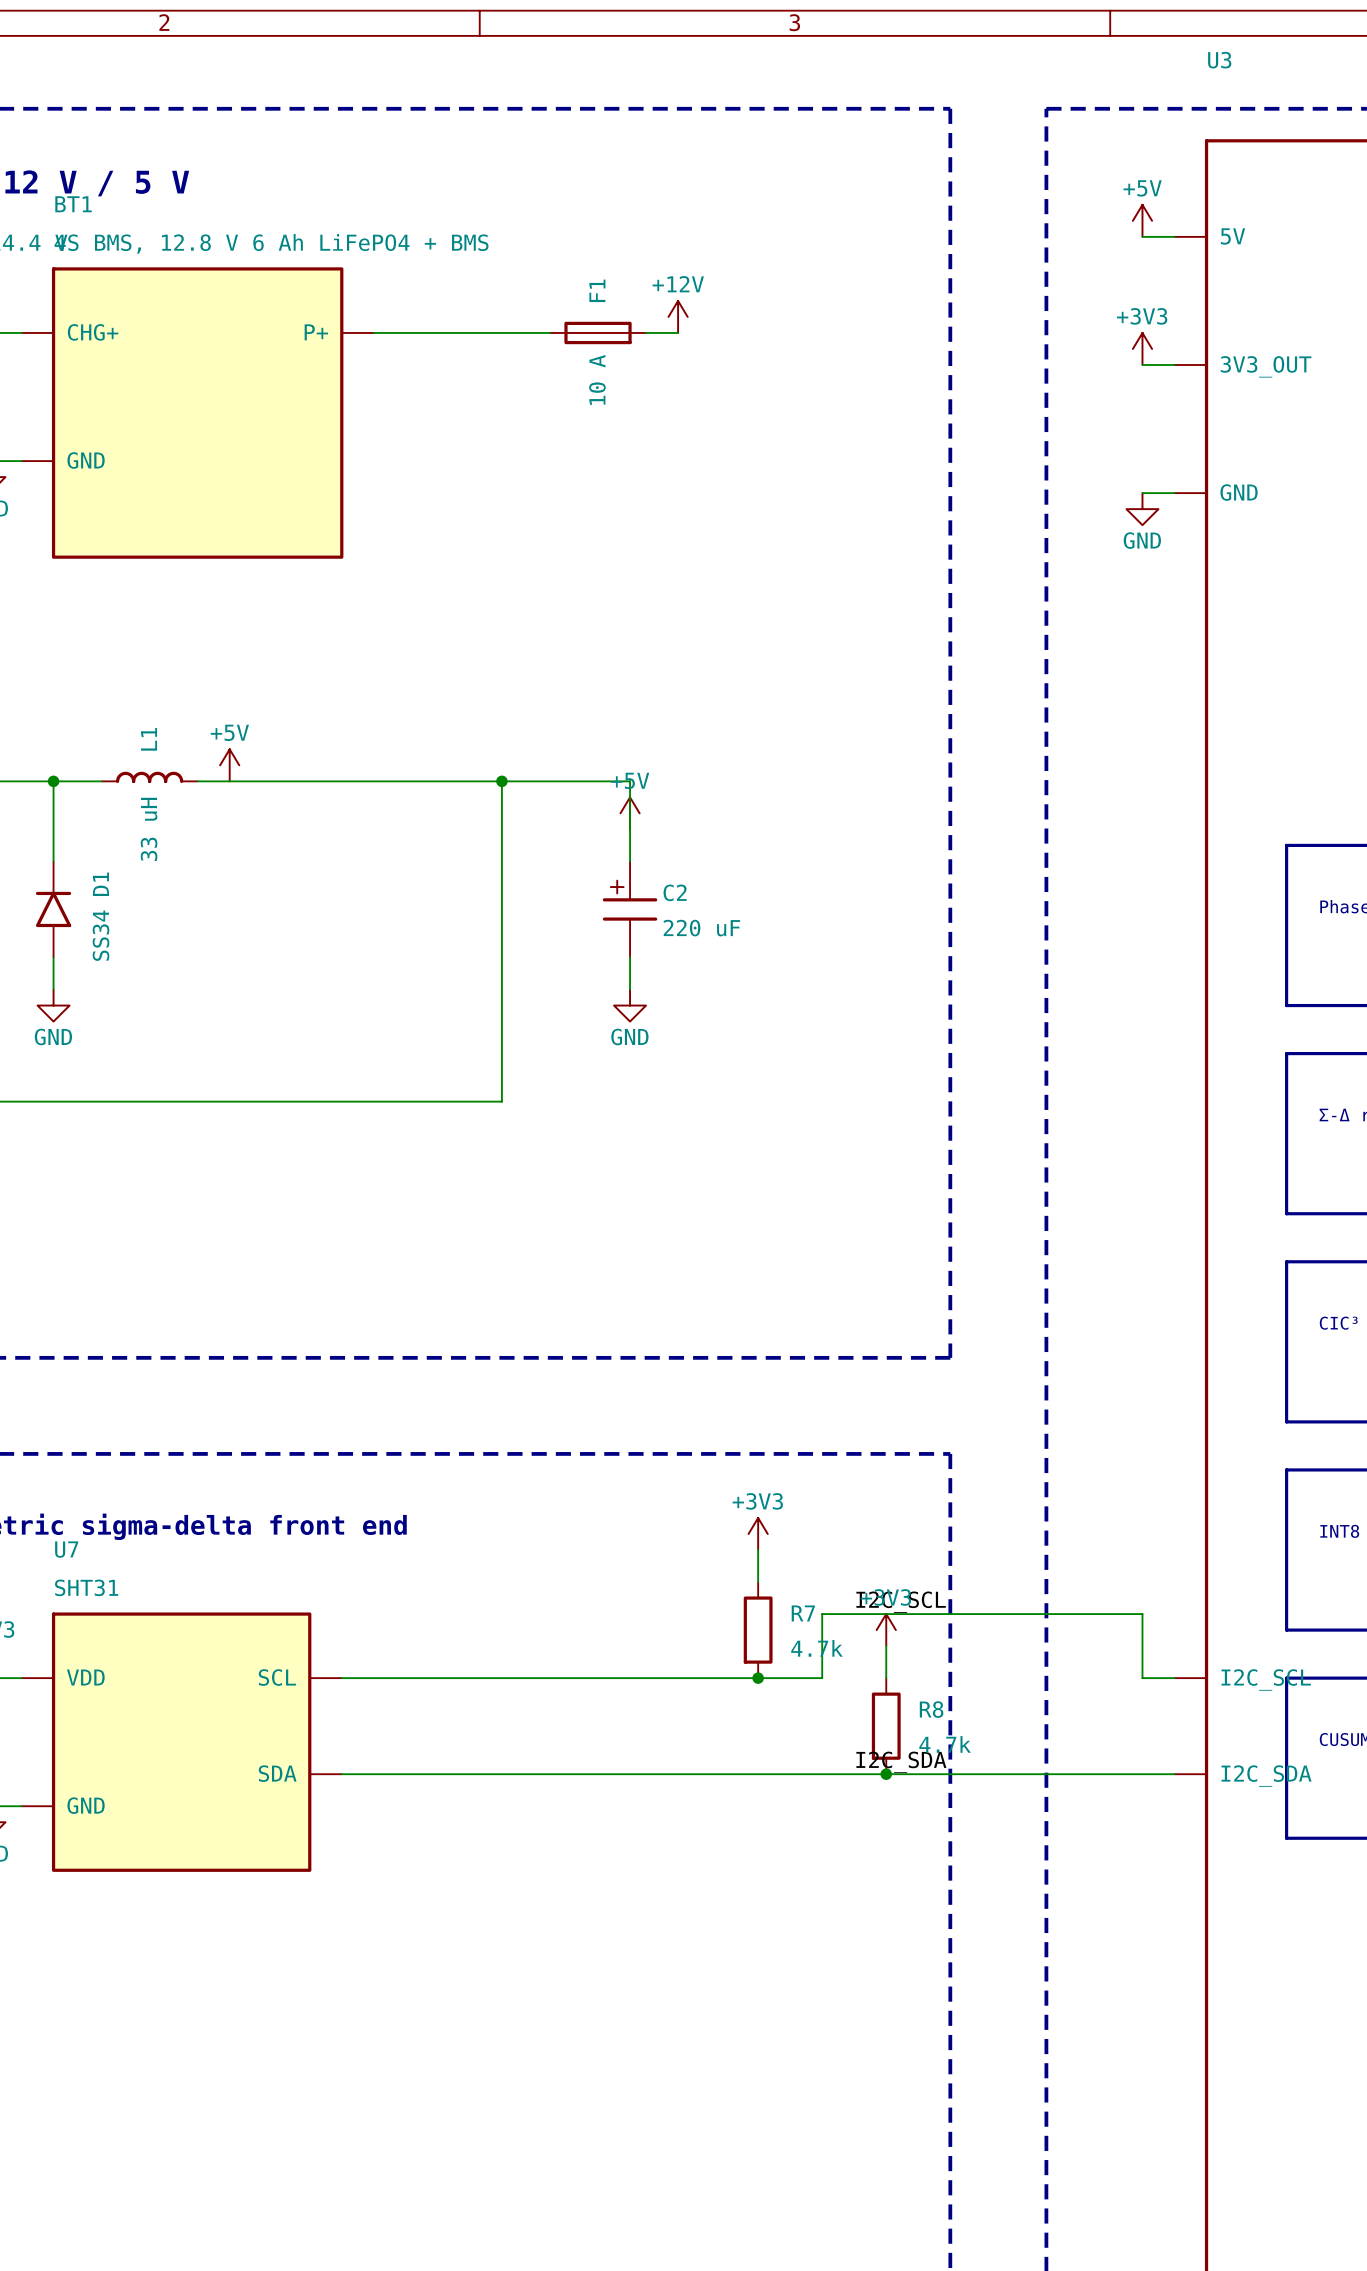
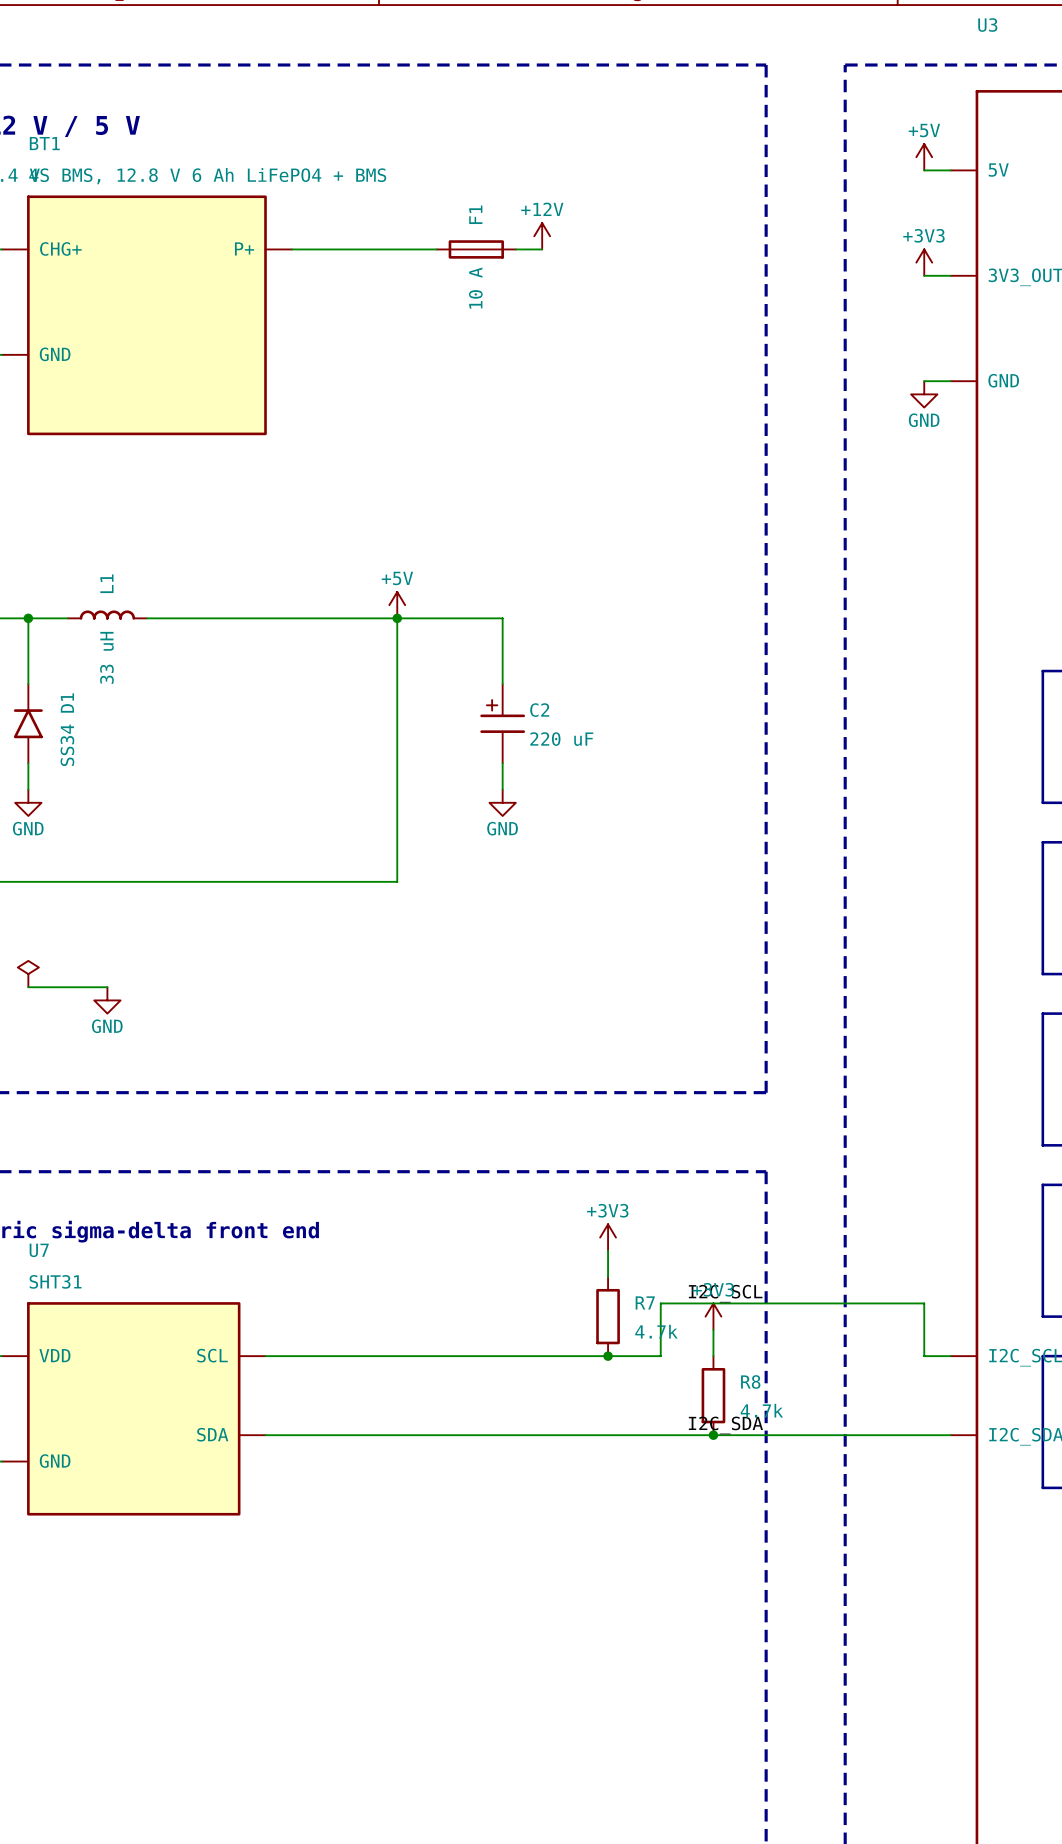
power symbol: +5V (229, 765) -> none
power symbol: none -> +5V (397, 605)
power symbol: +5V (630, 813) -> none
power symbol: none -> (28, 974)
wire: none -> (28, 987) (107, 987)
power symbol: none -> GND (107, 1000)

